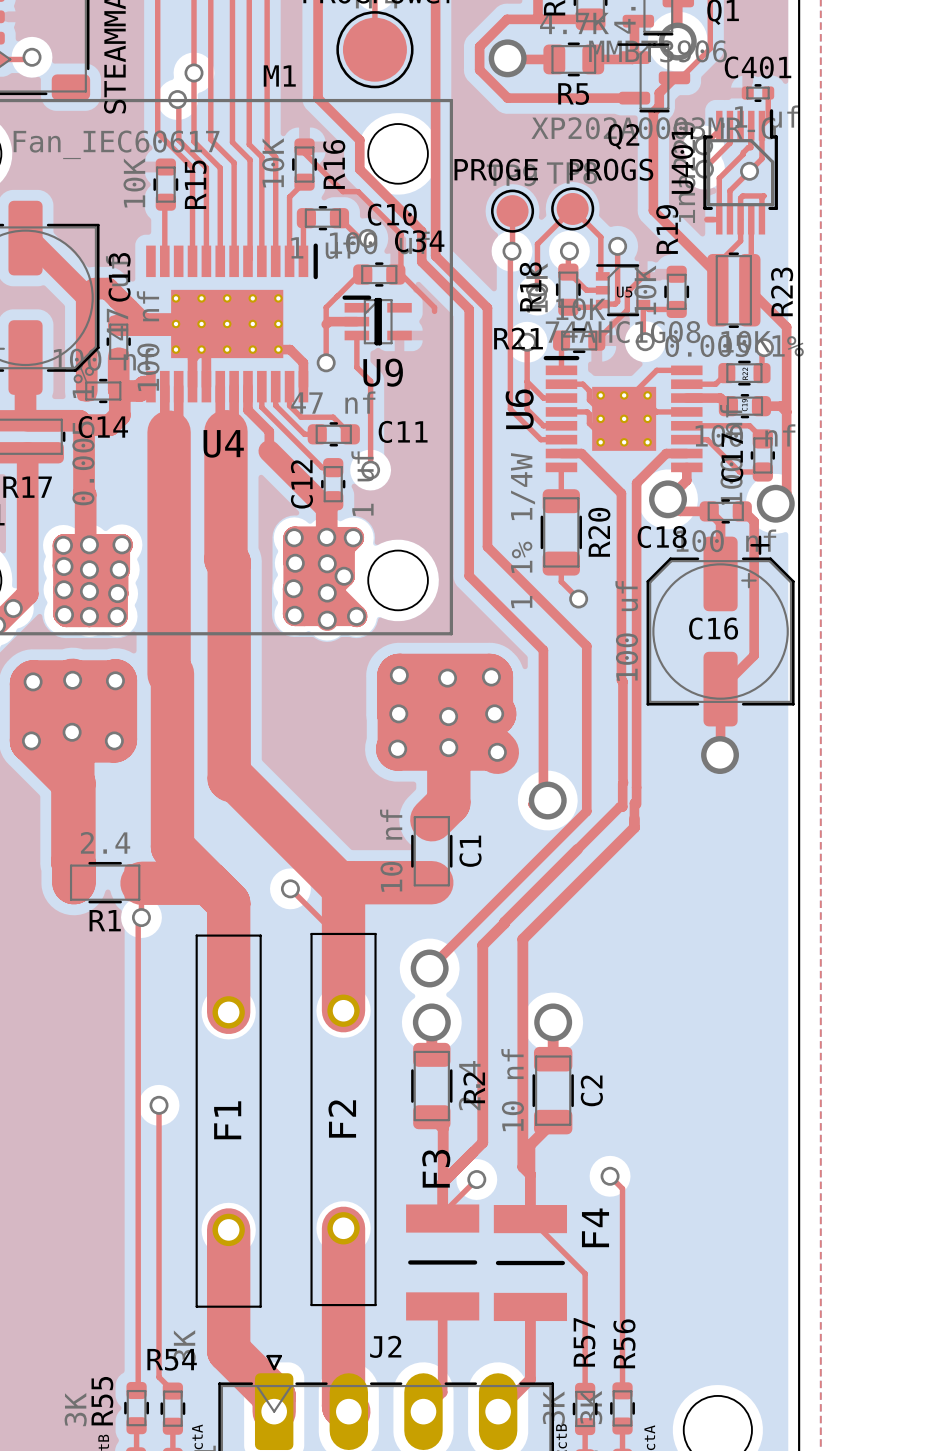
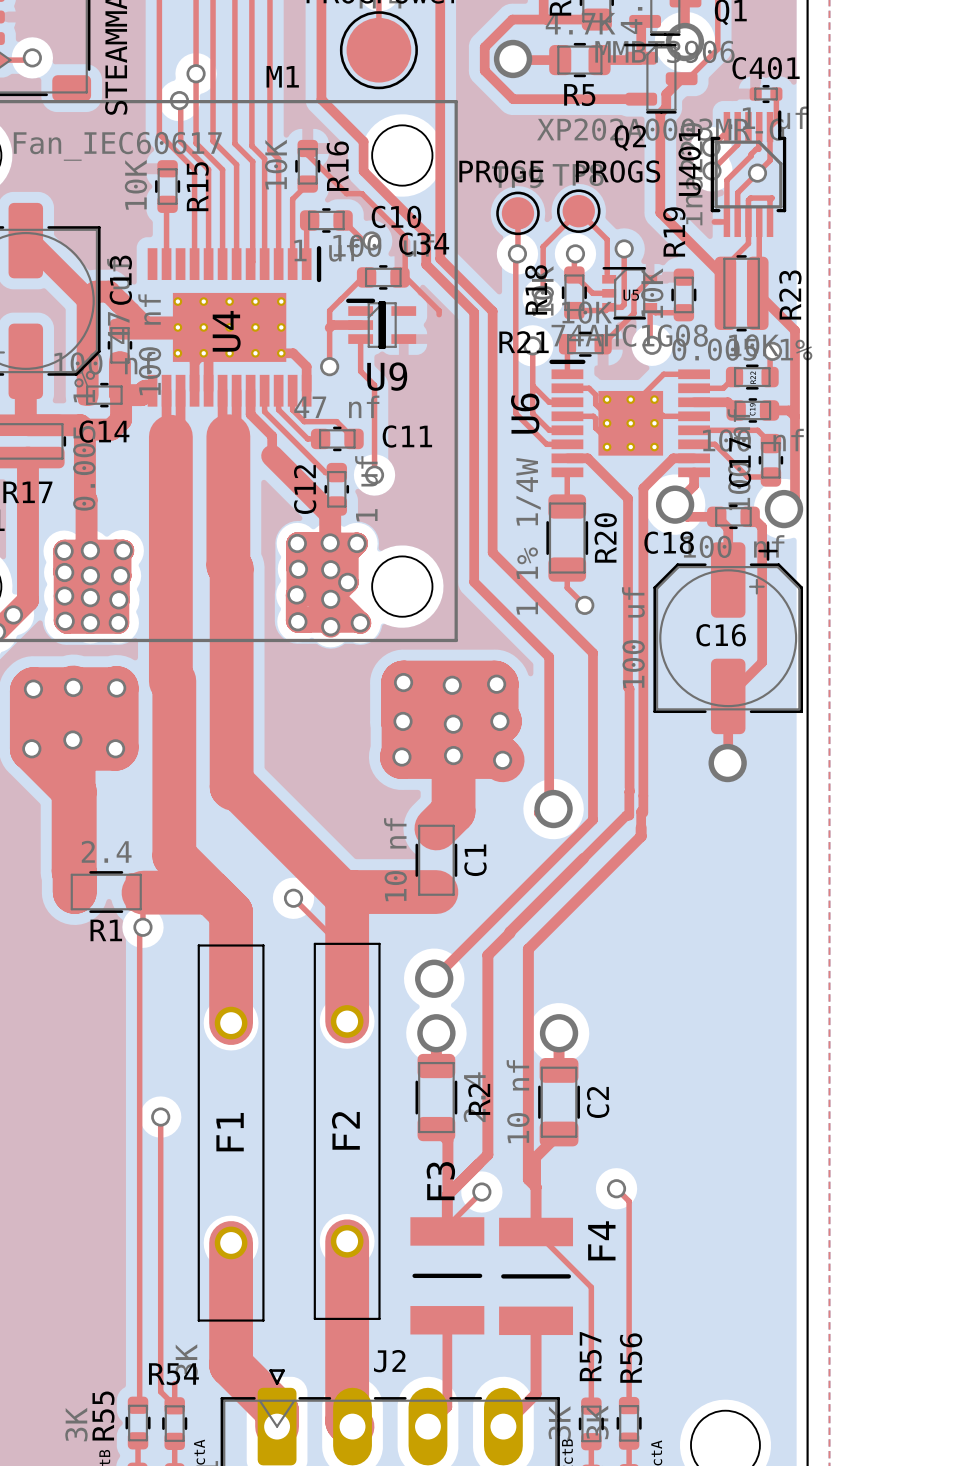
U4 name rotation: 0° (223, 443) -> 90° counterclockwise (226, 331)
U4 name position: U4 (223, 443) -> U4 (226, 331)
top track: none -> (174, 1383) (174, 1405)

